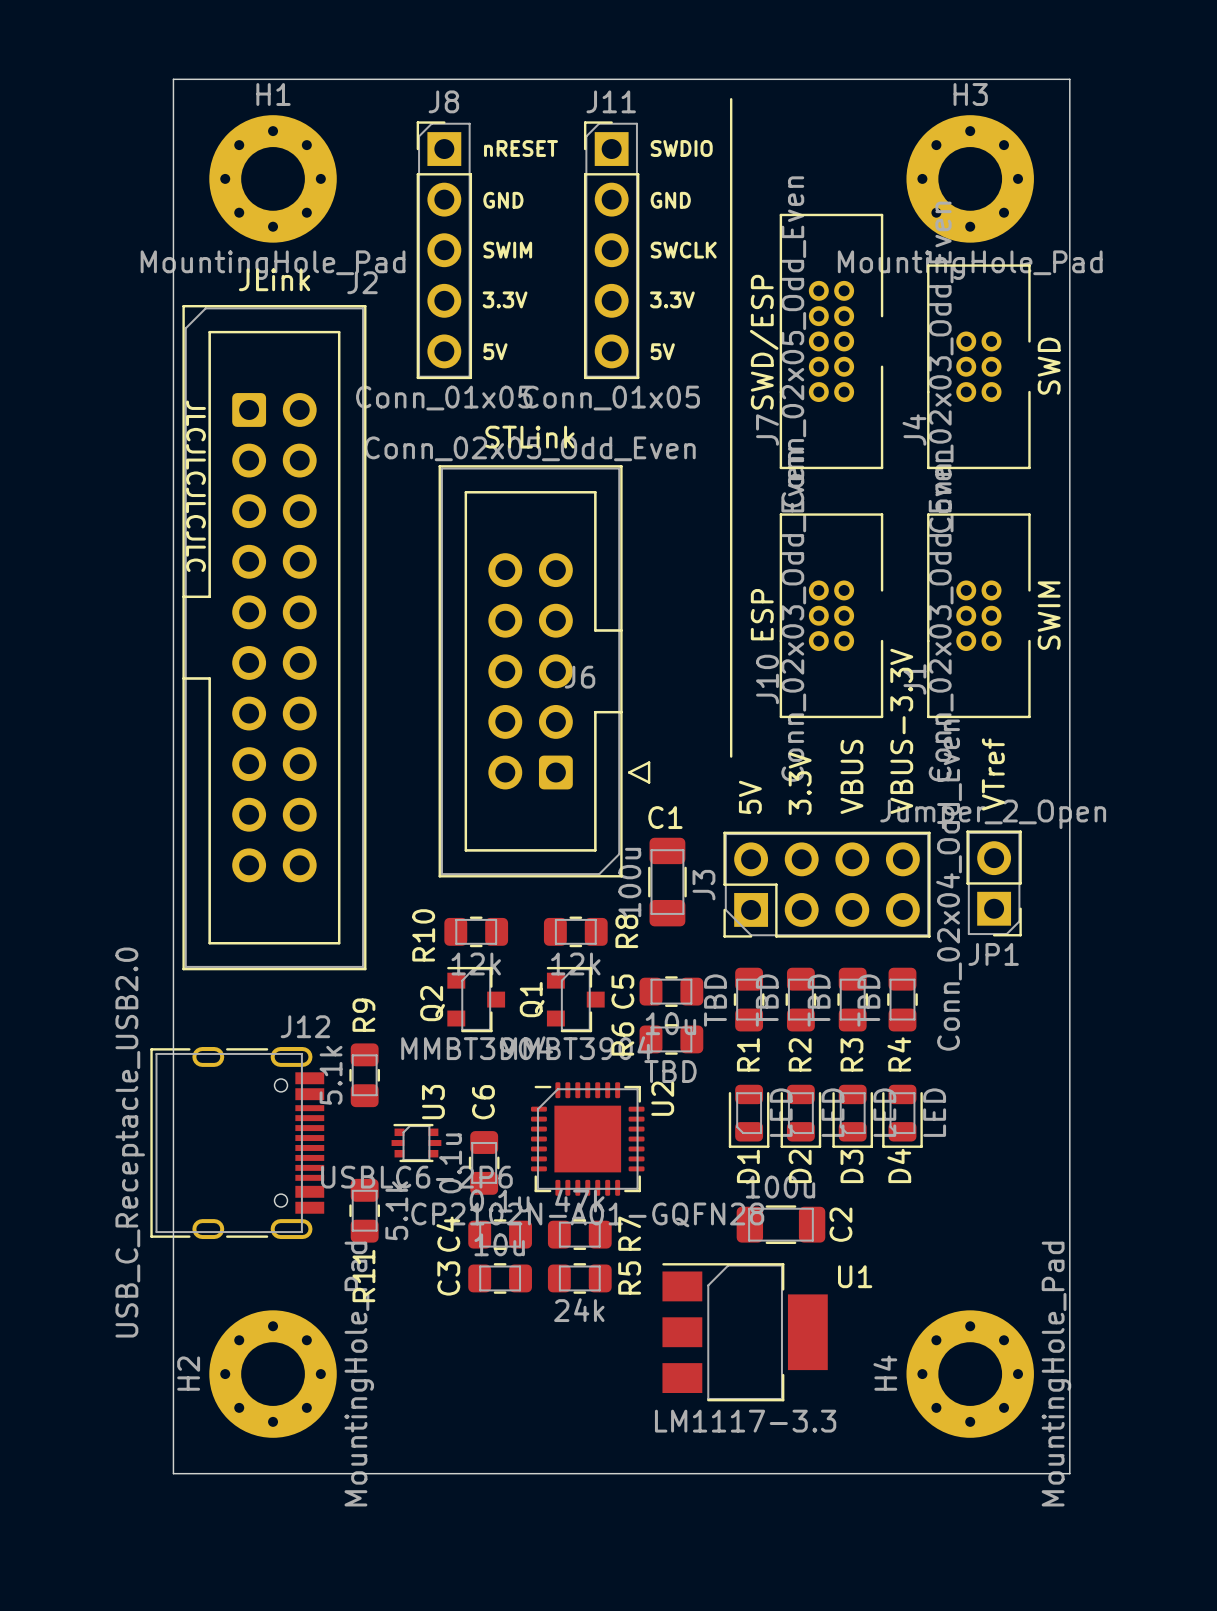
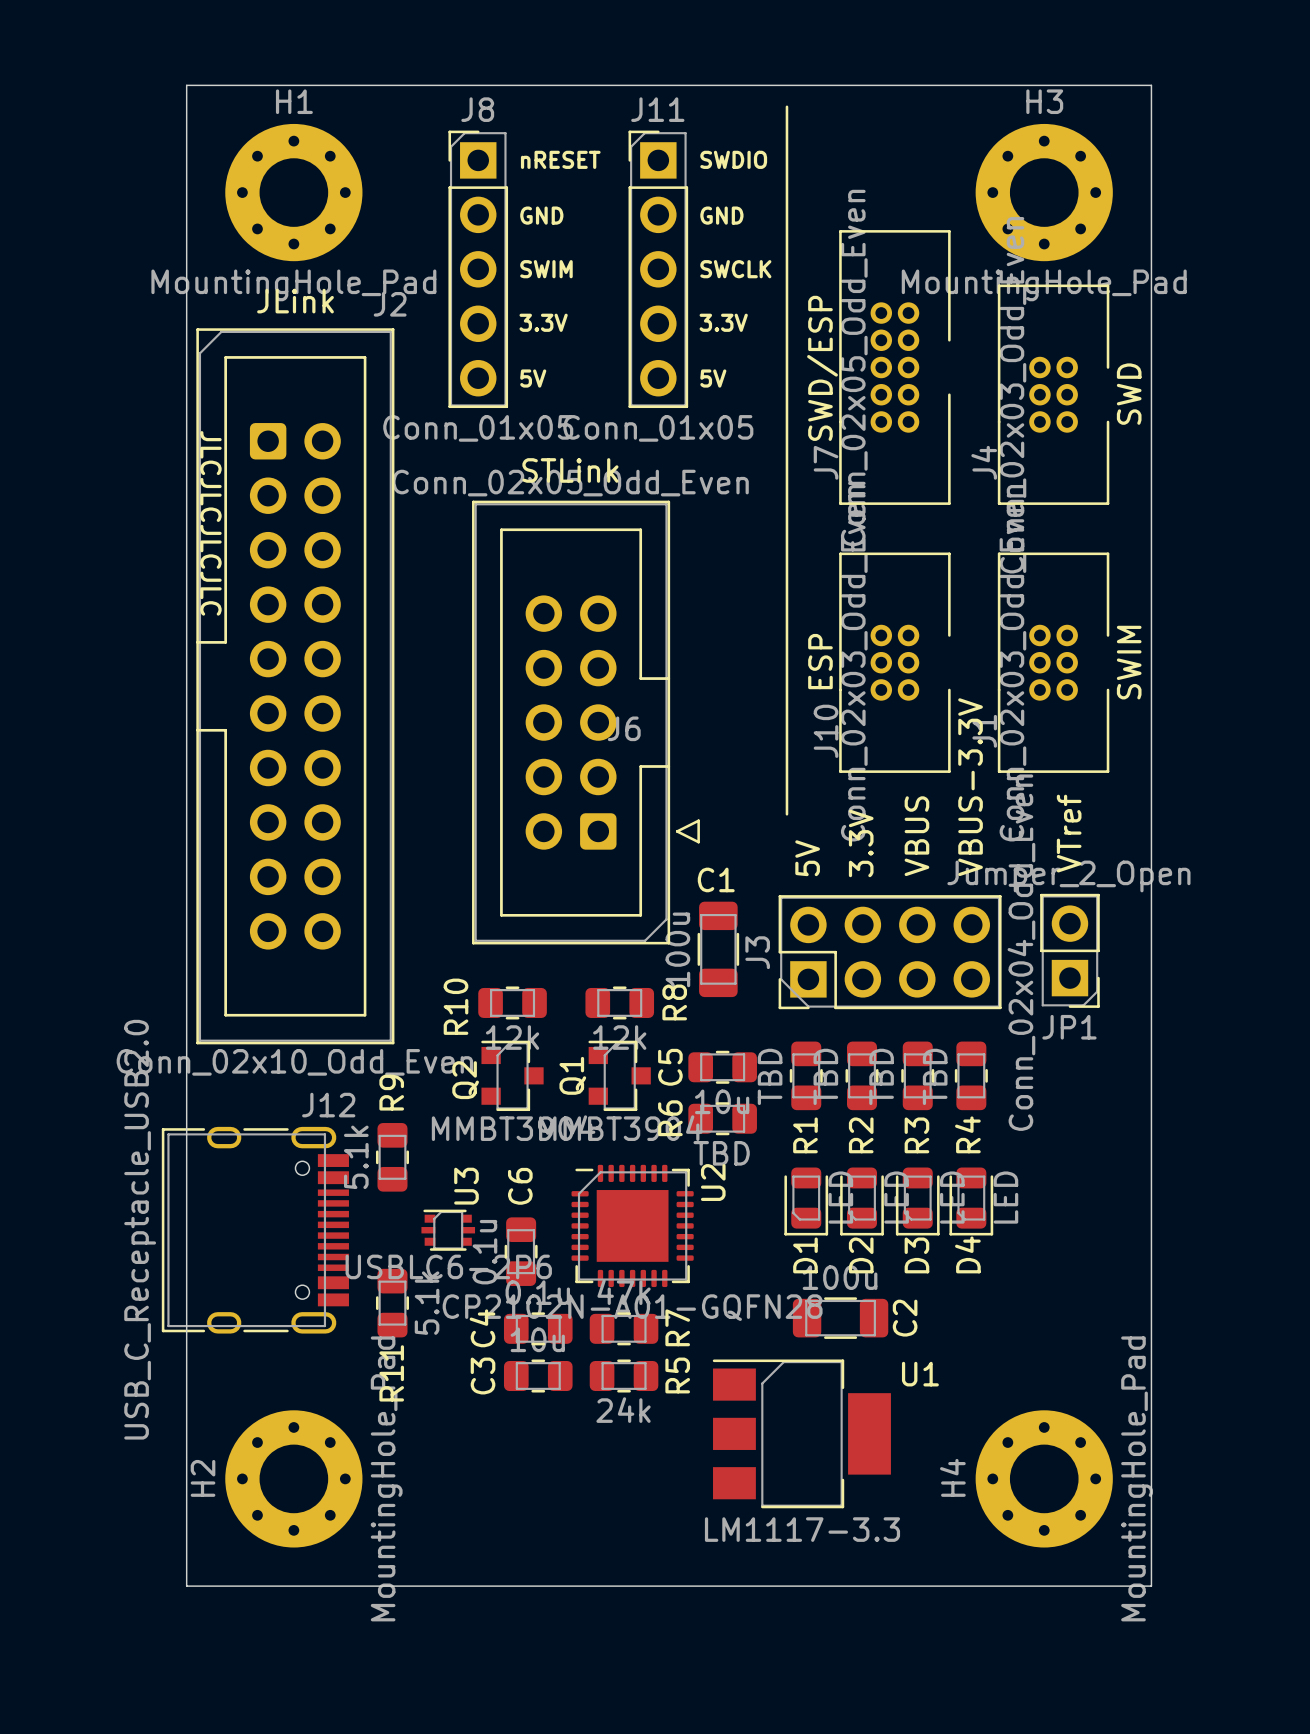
J2 value: none -> Conn_02x10_Odd_Even (294, 1062)

